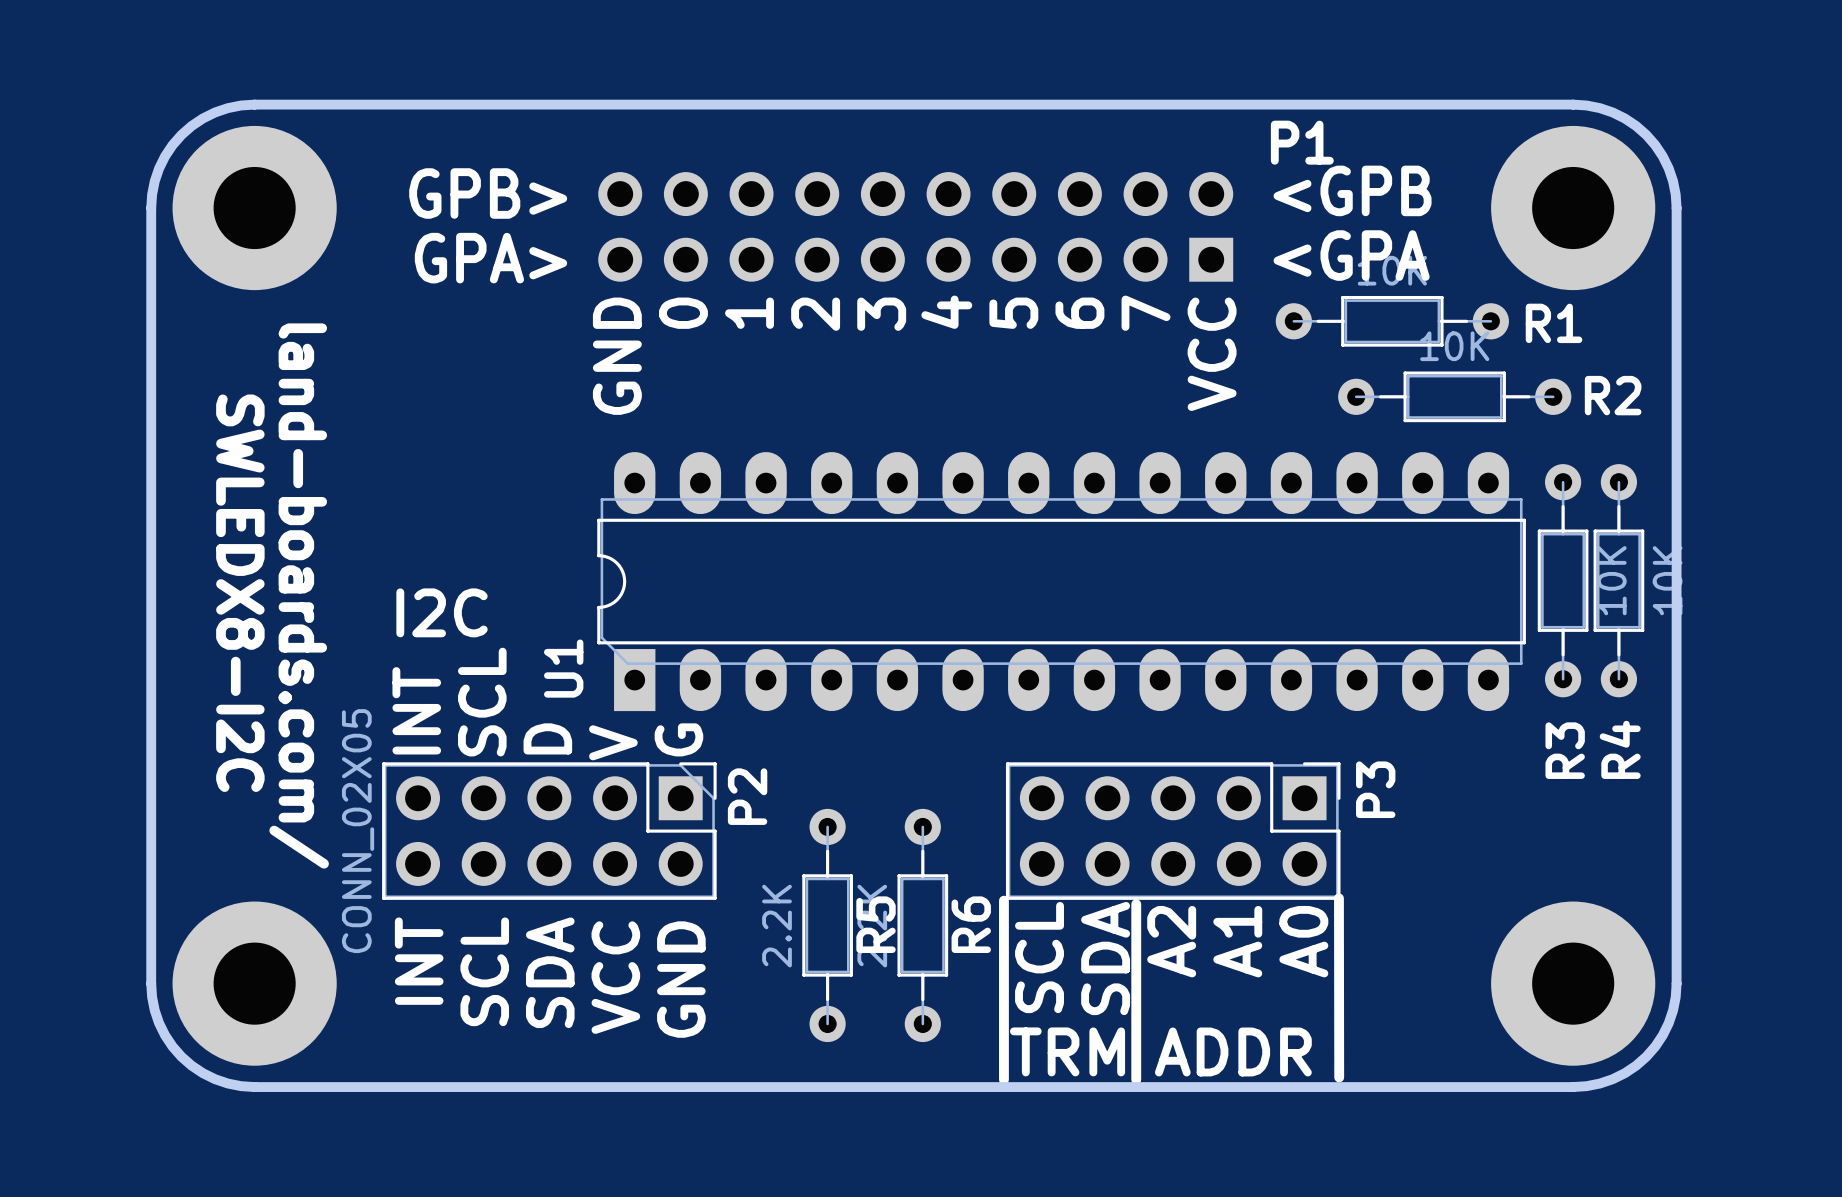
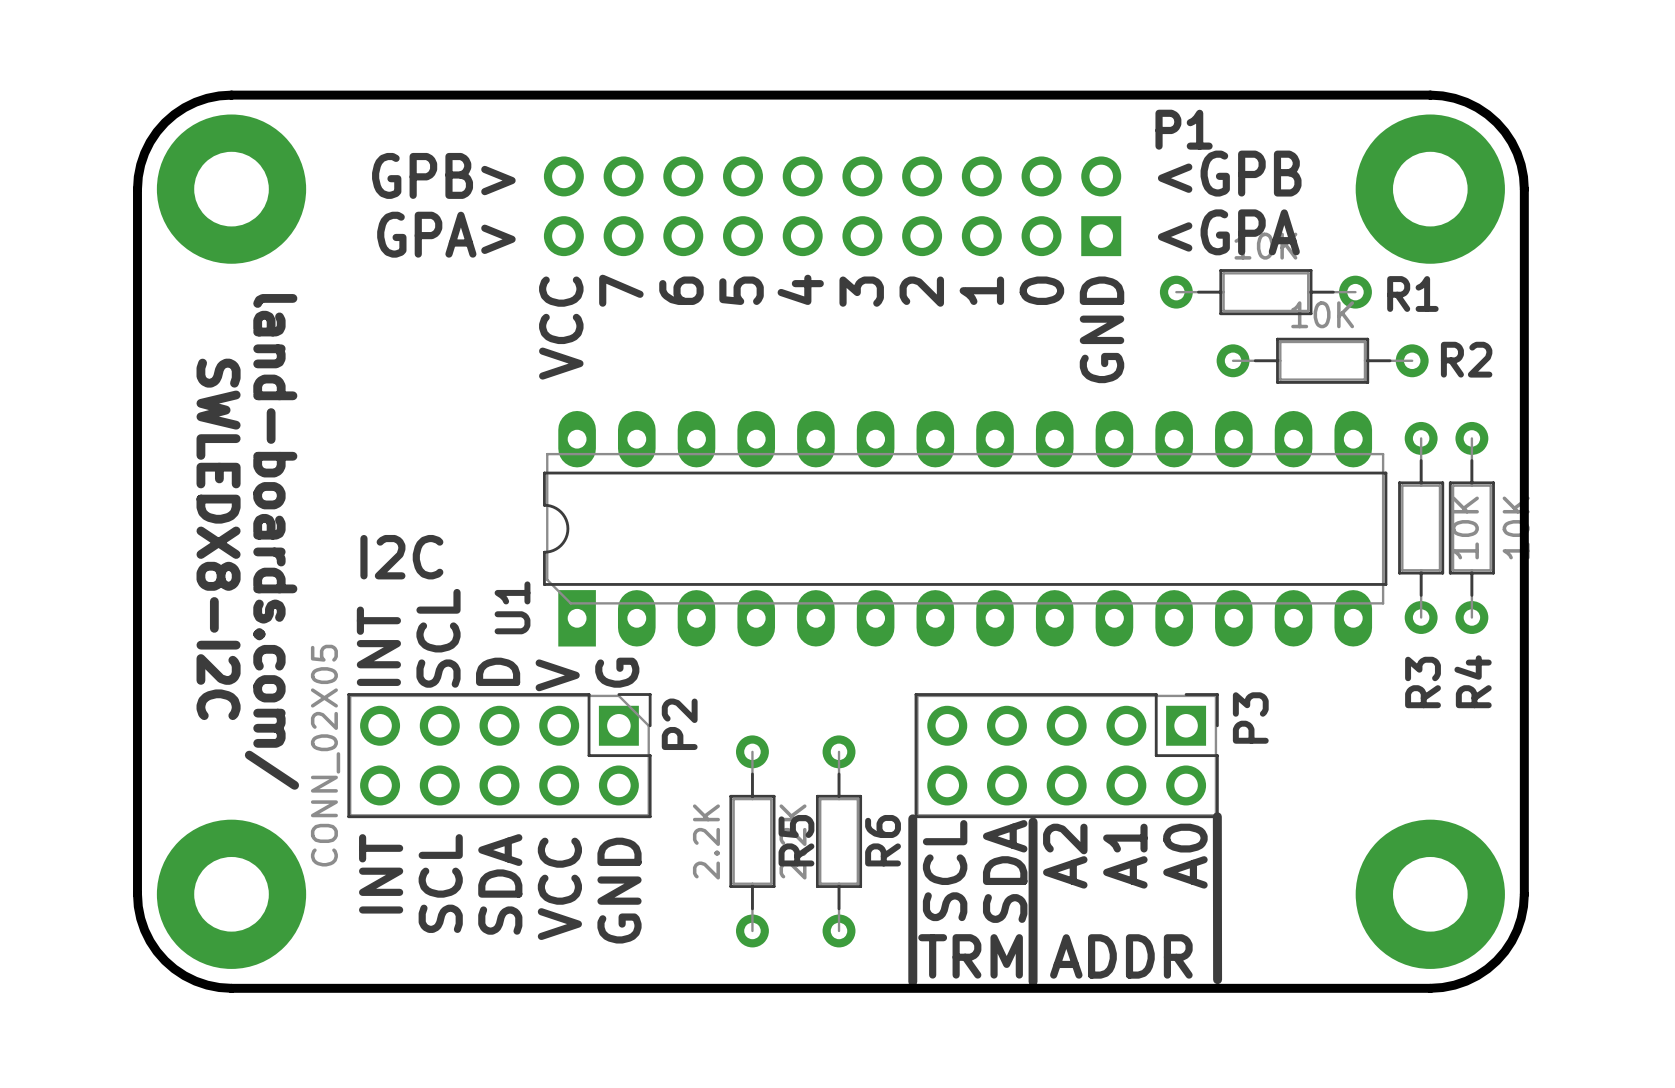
text position: 4 (946, 312) -> 4 (800, 289)
text position: 0 (683, 313) -> 0 (1041, 290)
text position: 1 (749, 313) -> 1 (981, 290)
text position: 5 (1013, 313) -> 5 (741, 290)
text position: 6 (1079, 313) -> 6 (681, 290)
text position: 7 (1146, 313) -> 7 (621, 290)
text position: 2 (815, 314) -> 2 (921, 291)
text position: 3 (881, 314) -> 3 (861, 291)
text position: VCC (1212, 354) -> VCC (561, 328)
text position: GND (617, 356) -> GND (1102, 329)

